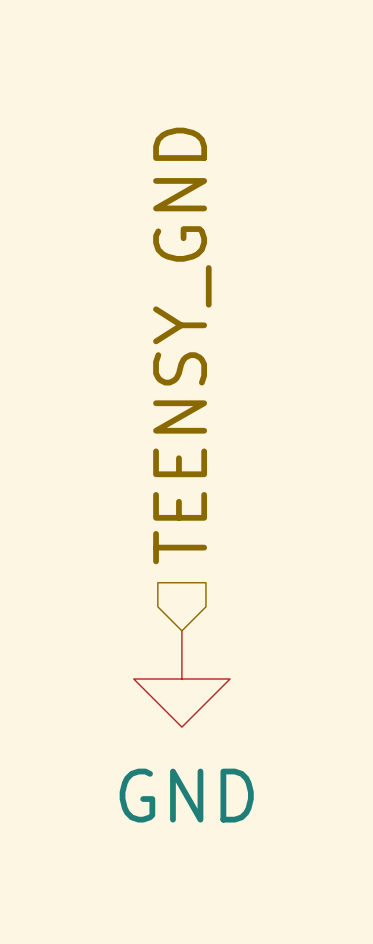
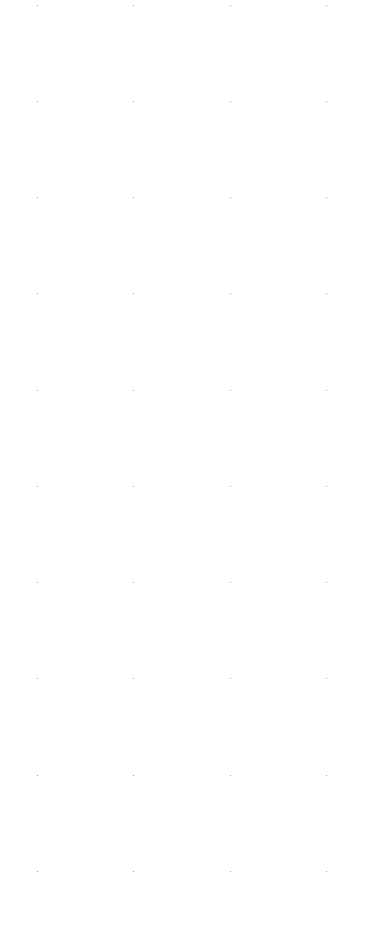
hierarchical label: TEENSY_GND (182, 345) -> none
power symbol: GND (181, 678) -> none

